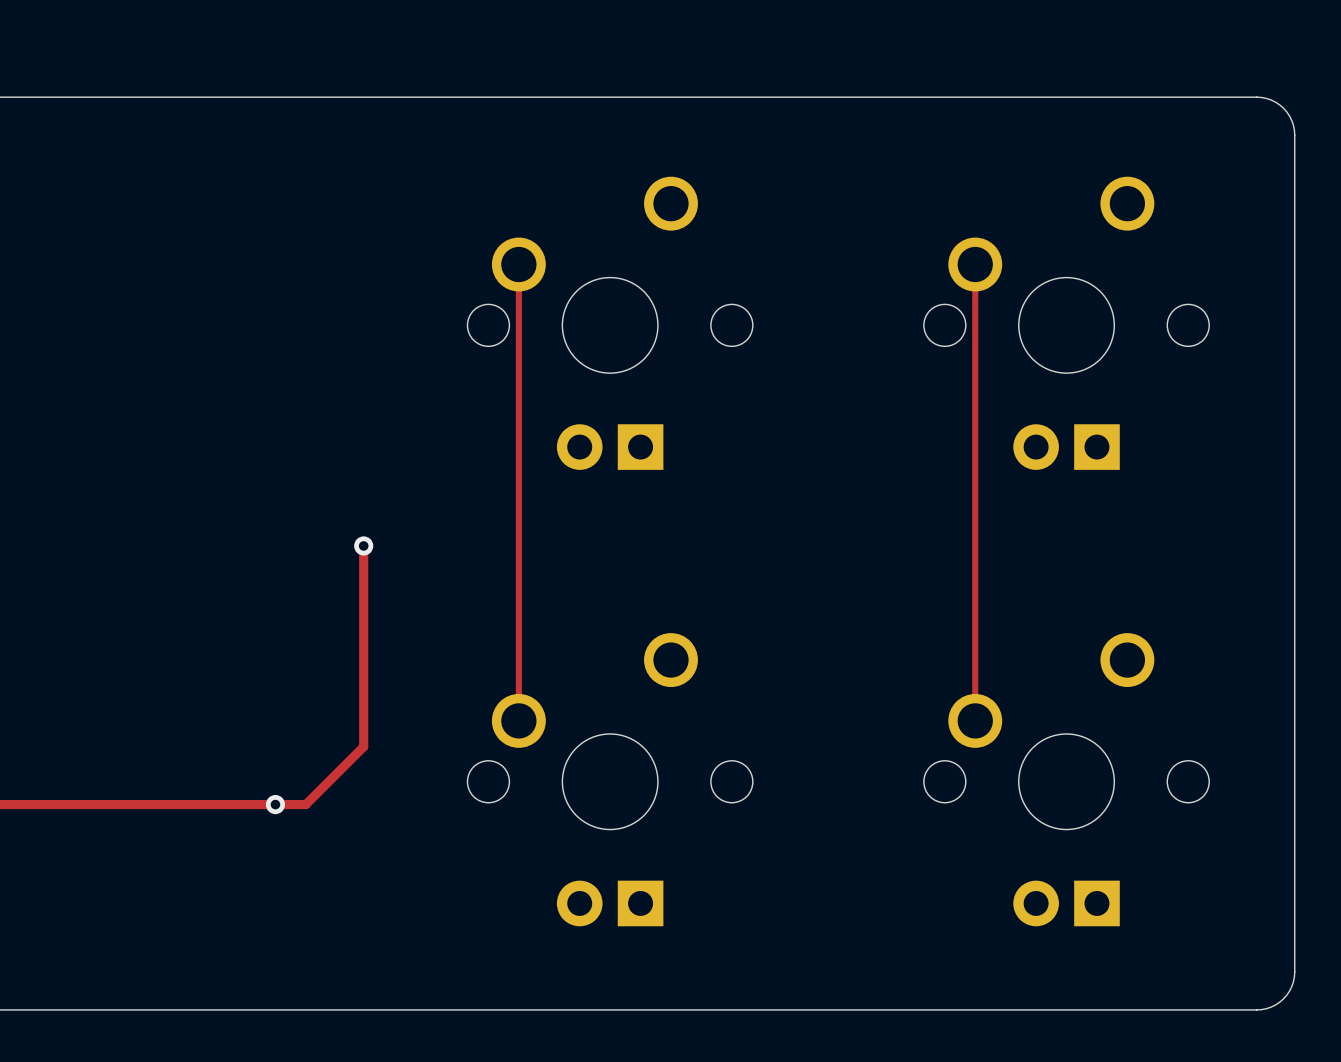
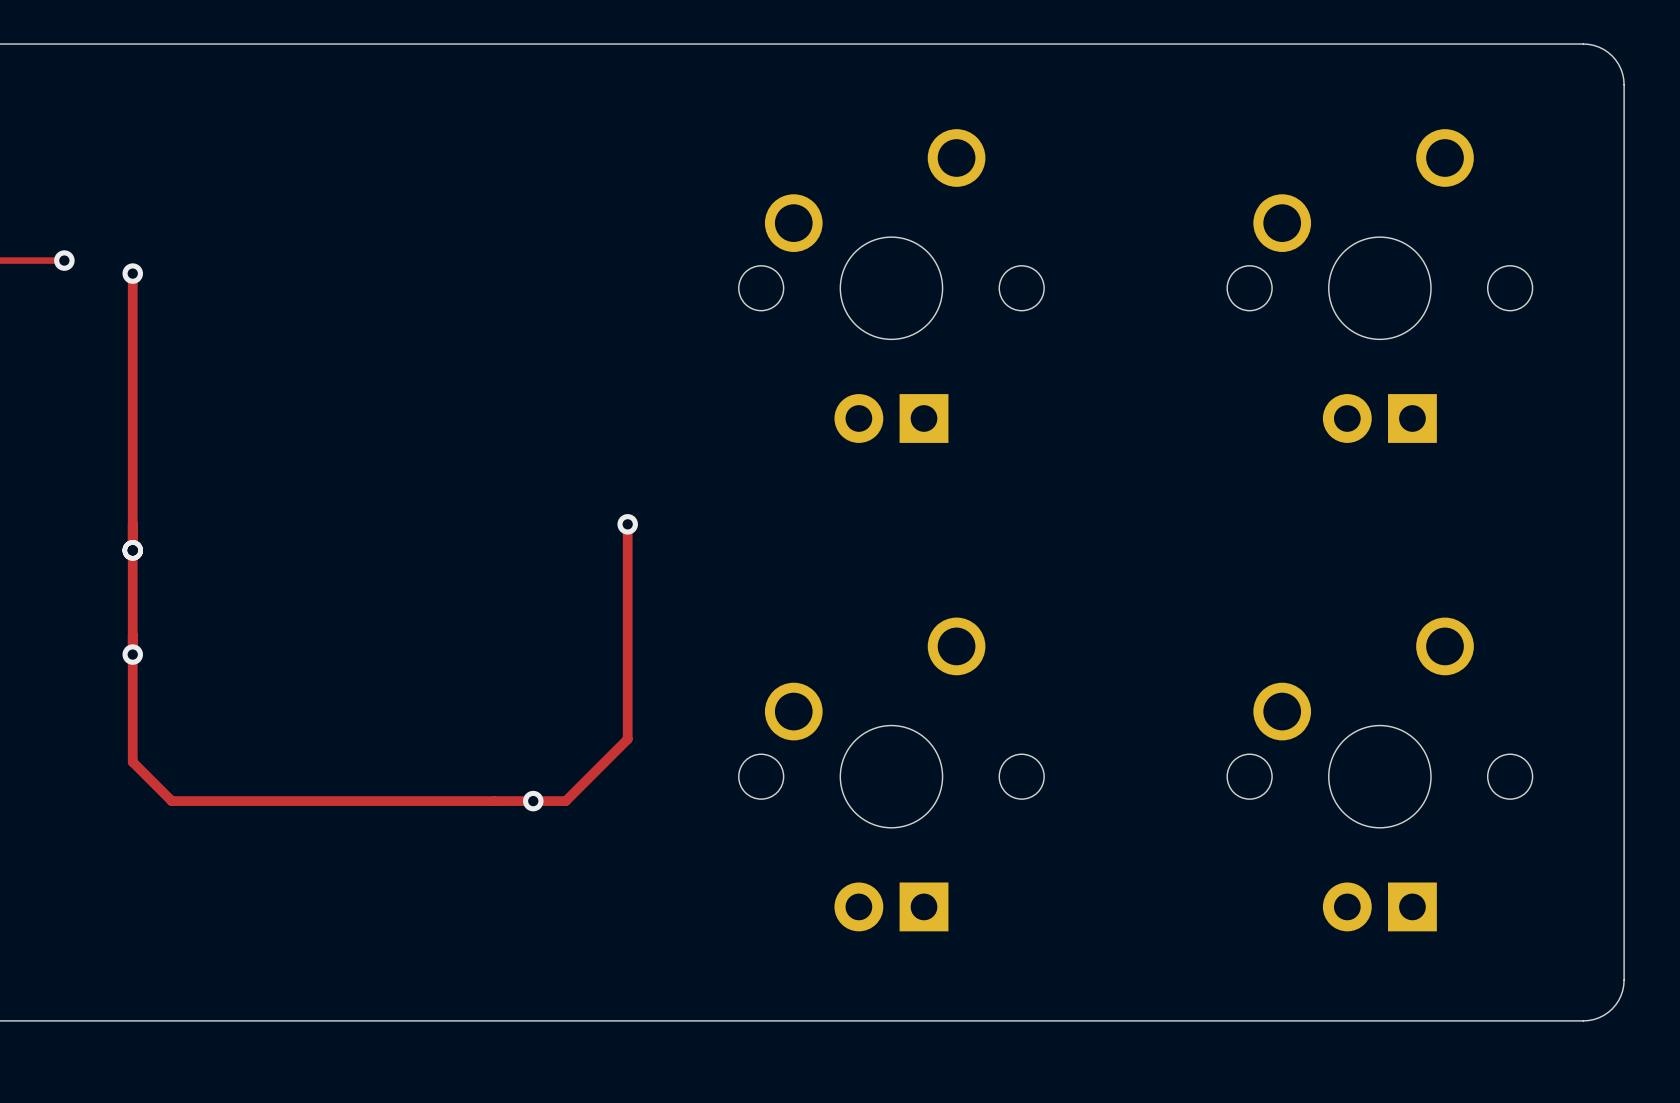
track: (518, 264) (518, 720) -> none
track: (975, 264) (975, 720) -> none

